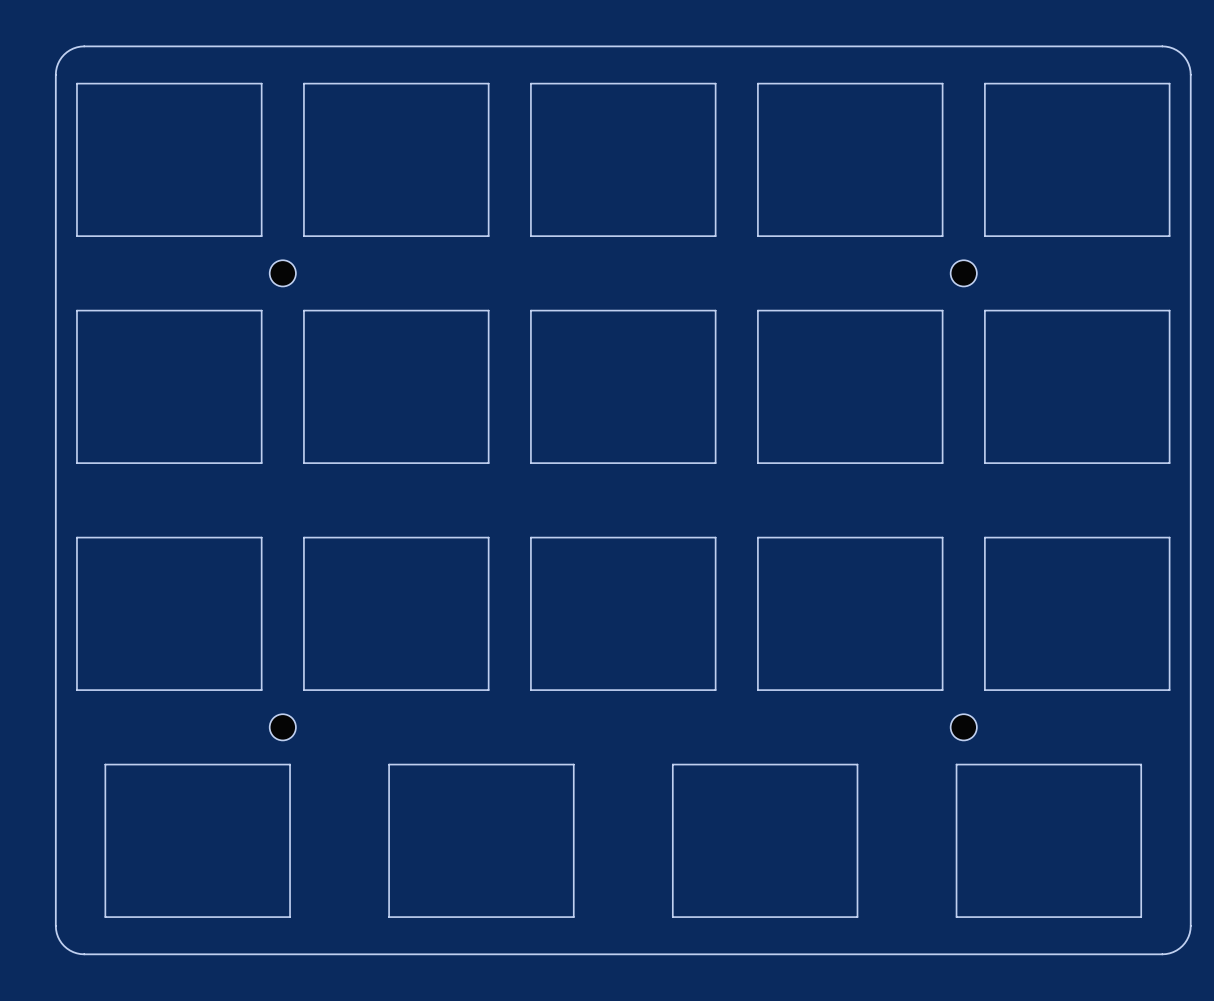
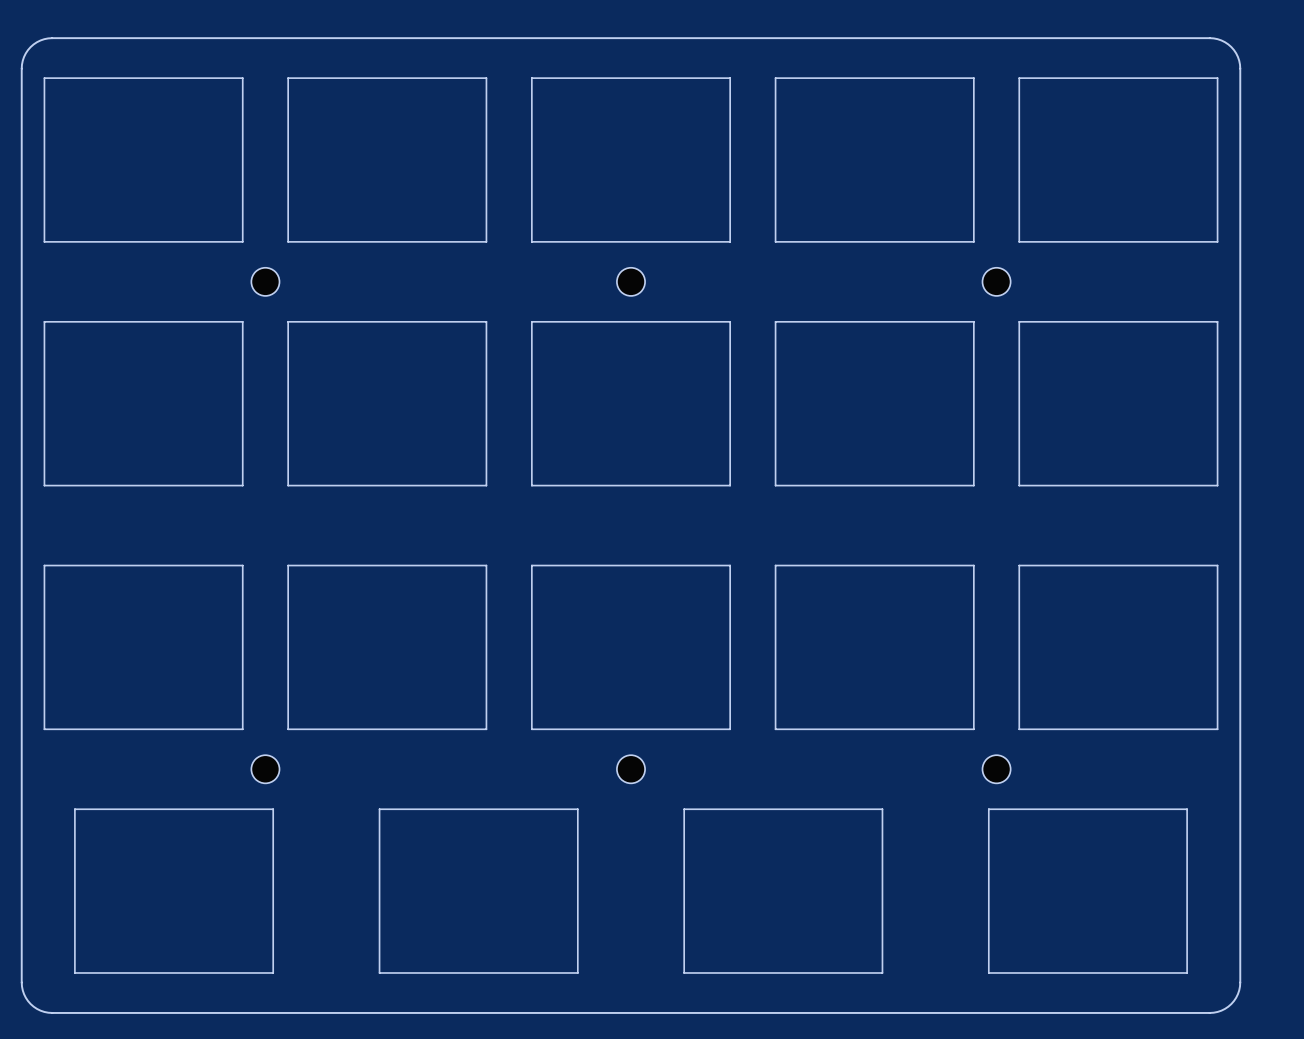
part: none -> (631, 281)
part: none -> (631, 769)

